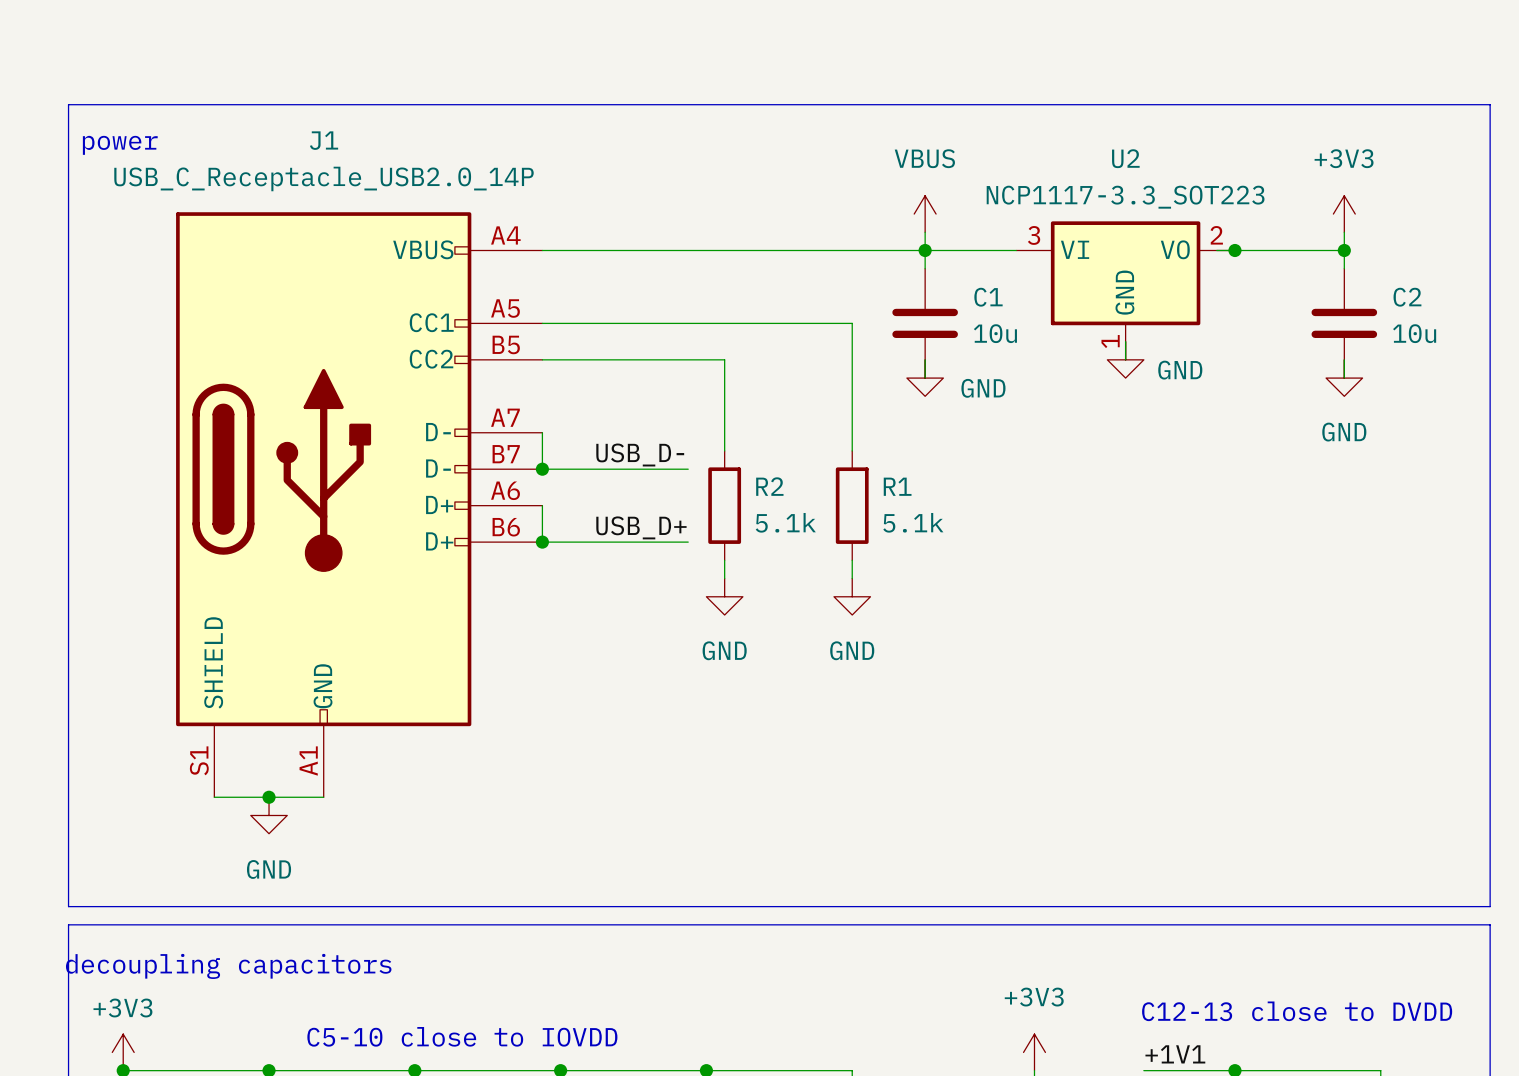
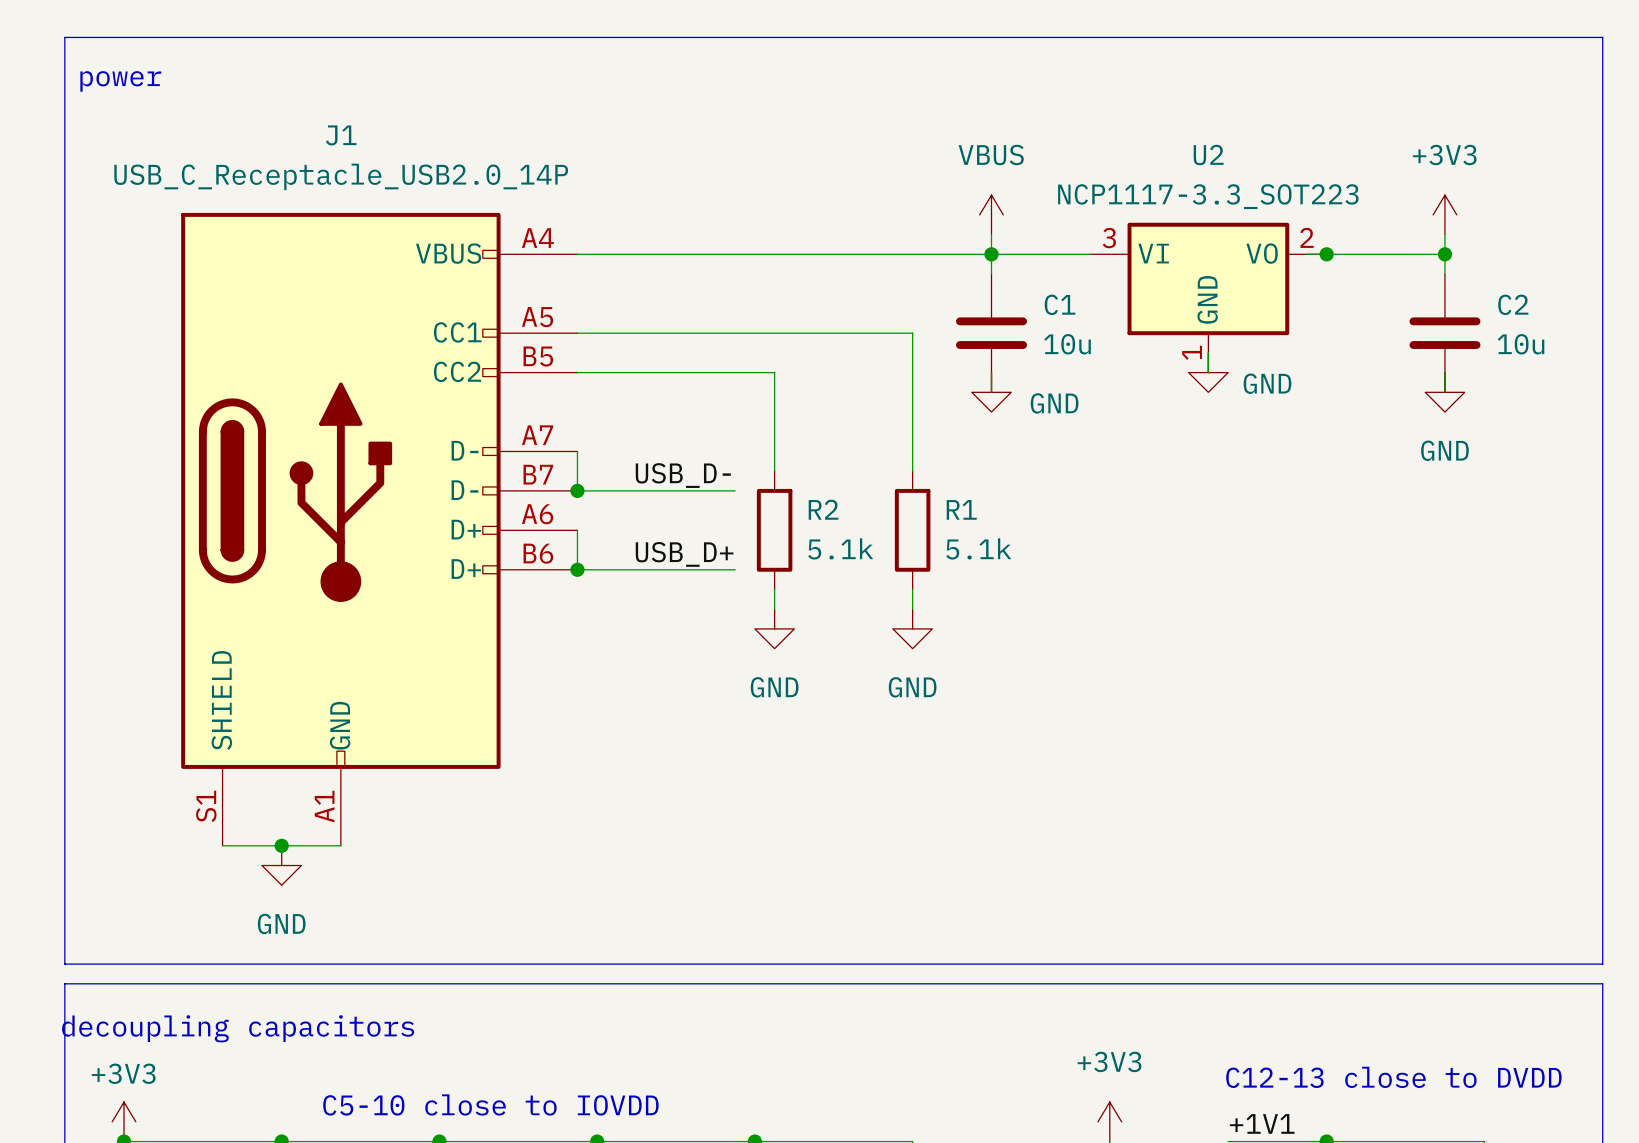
line: (68, 104) (1490, 104) -> (64, 96) (64, 37) (1602, 37) (1602, 96)
text position: power (120, 145) -> power (120, 81)

